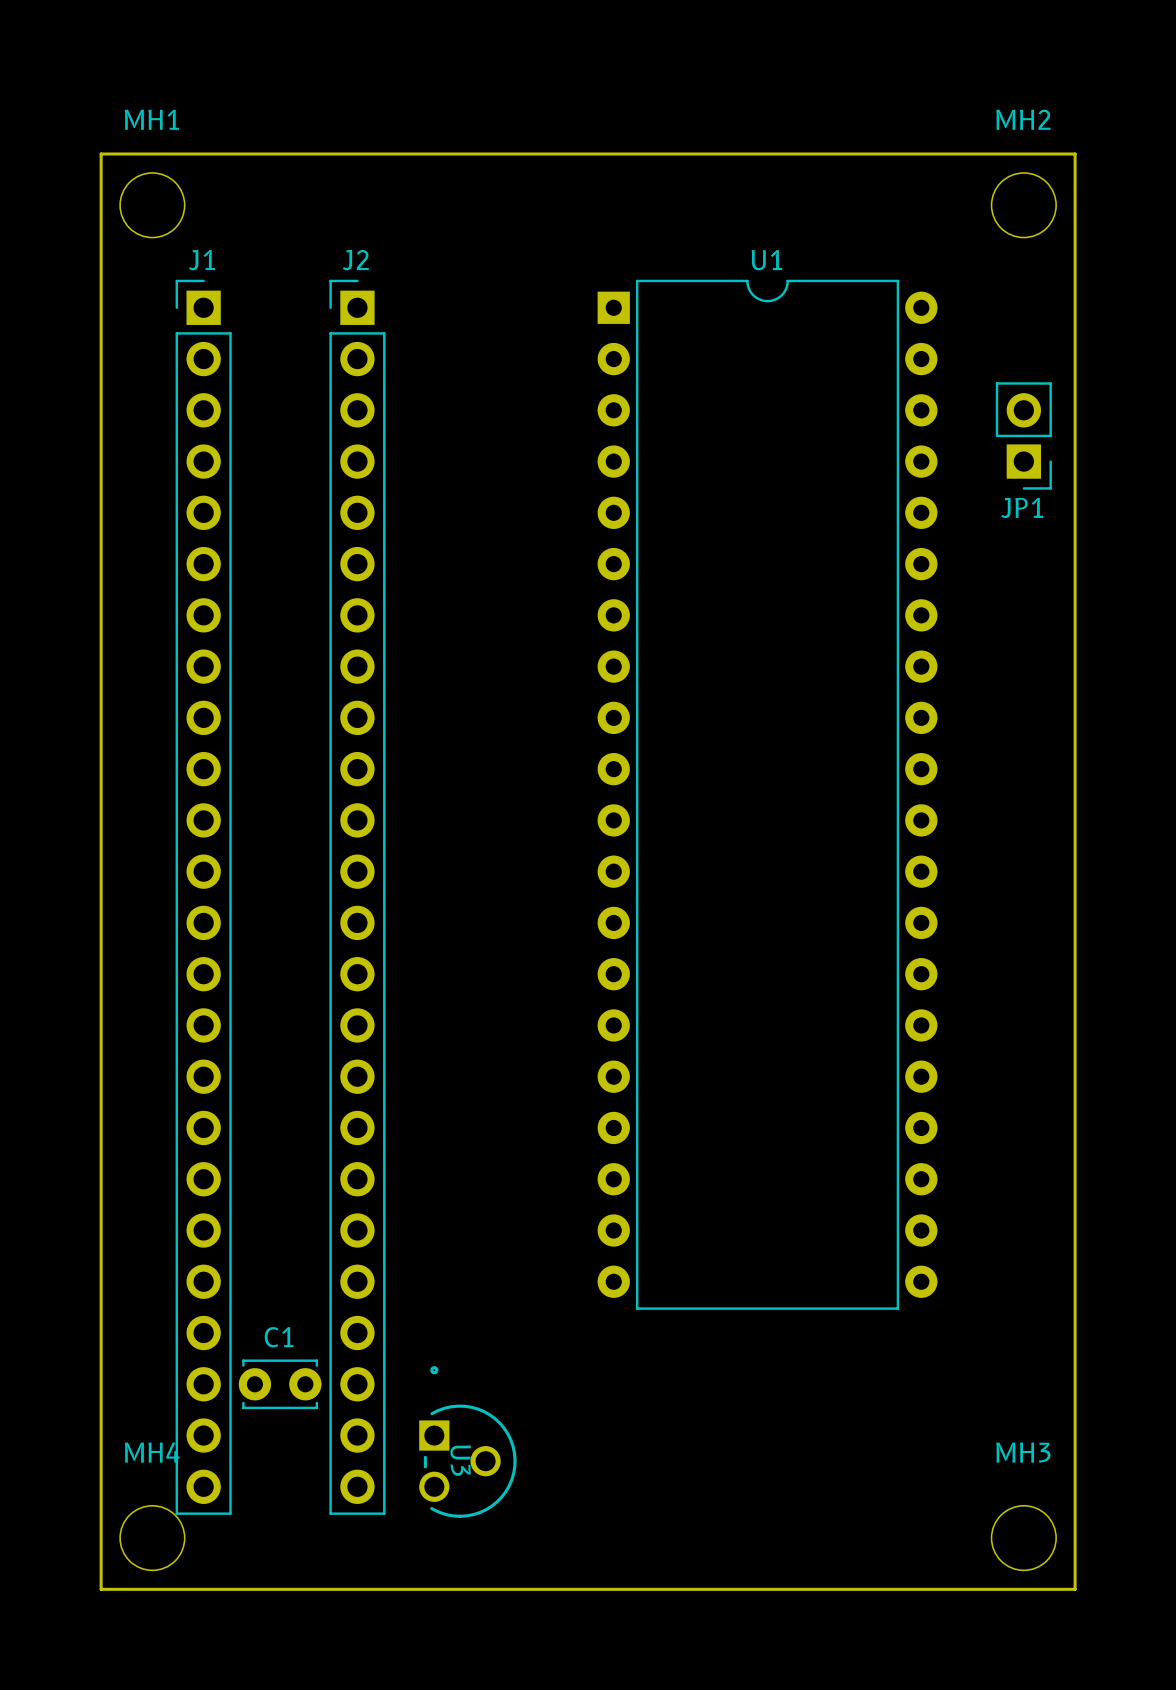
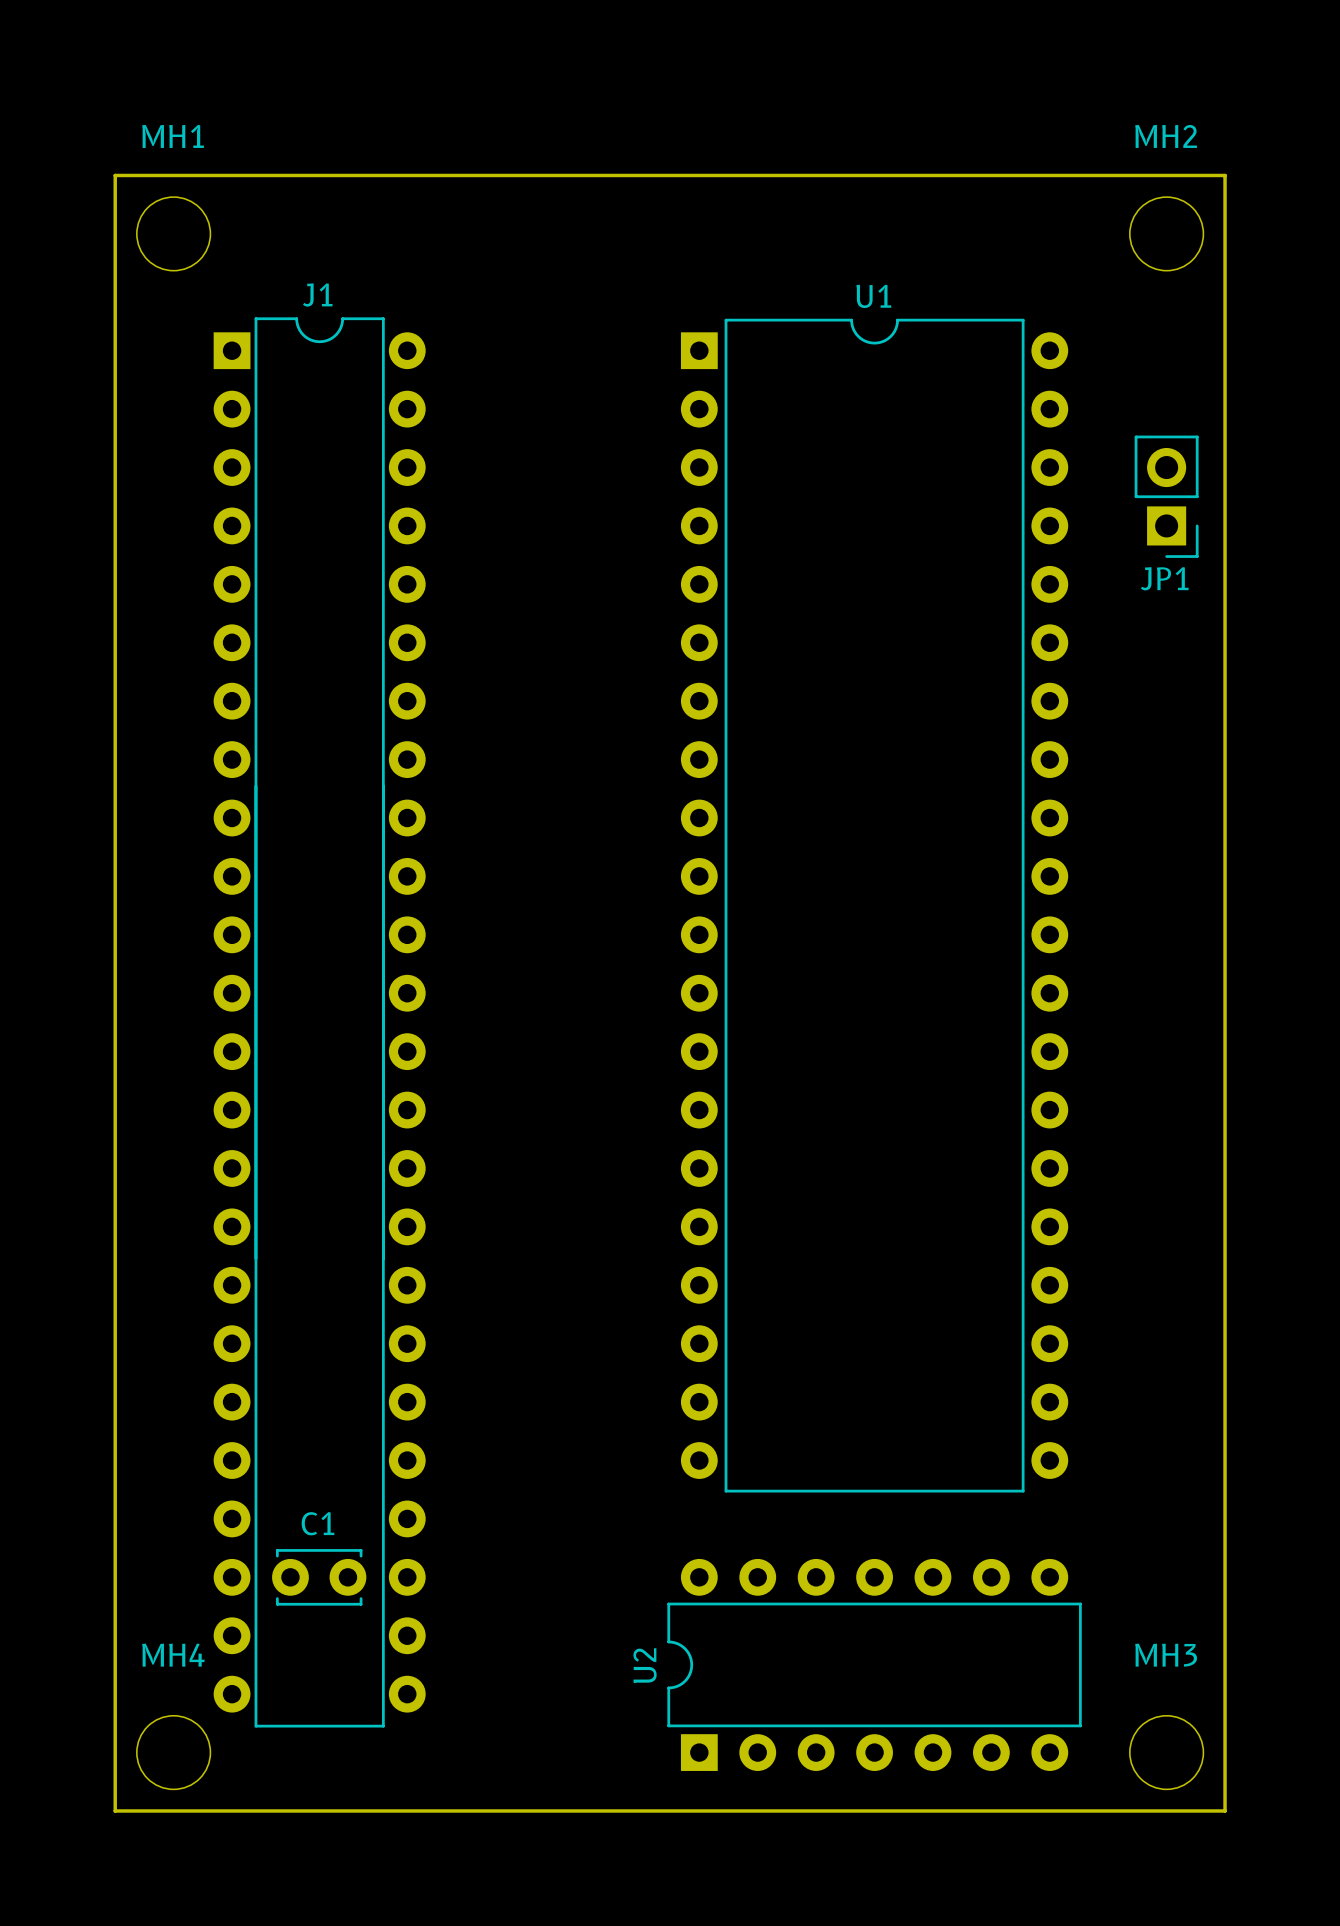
J1 footprint: [175, 279, 232, 1515] -> [213, 317, 426, 1728]
J2: (357, 897) -> none
U3: (467, 1441) -> none
U2: none -> (874, 1664)

